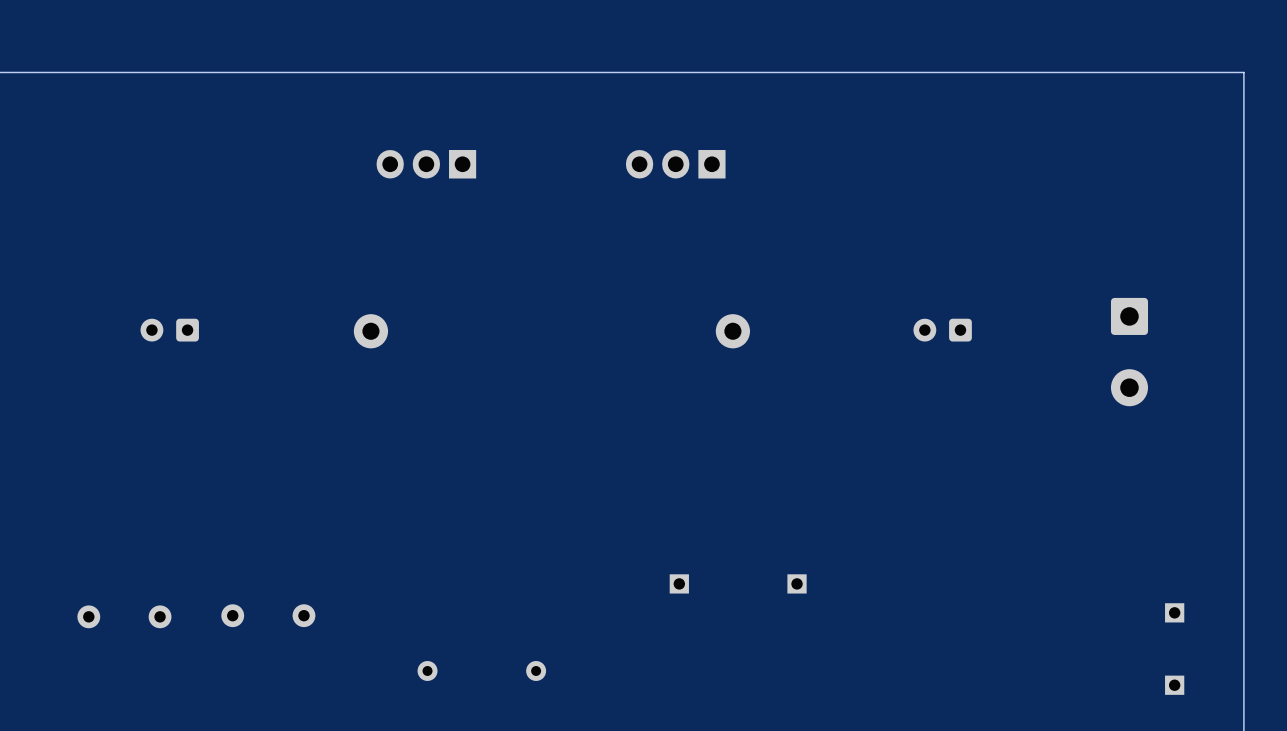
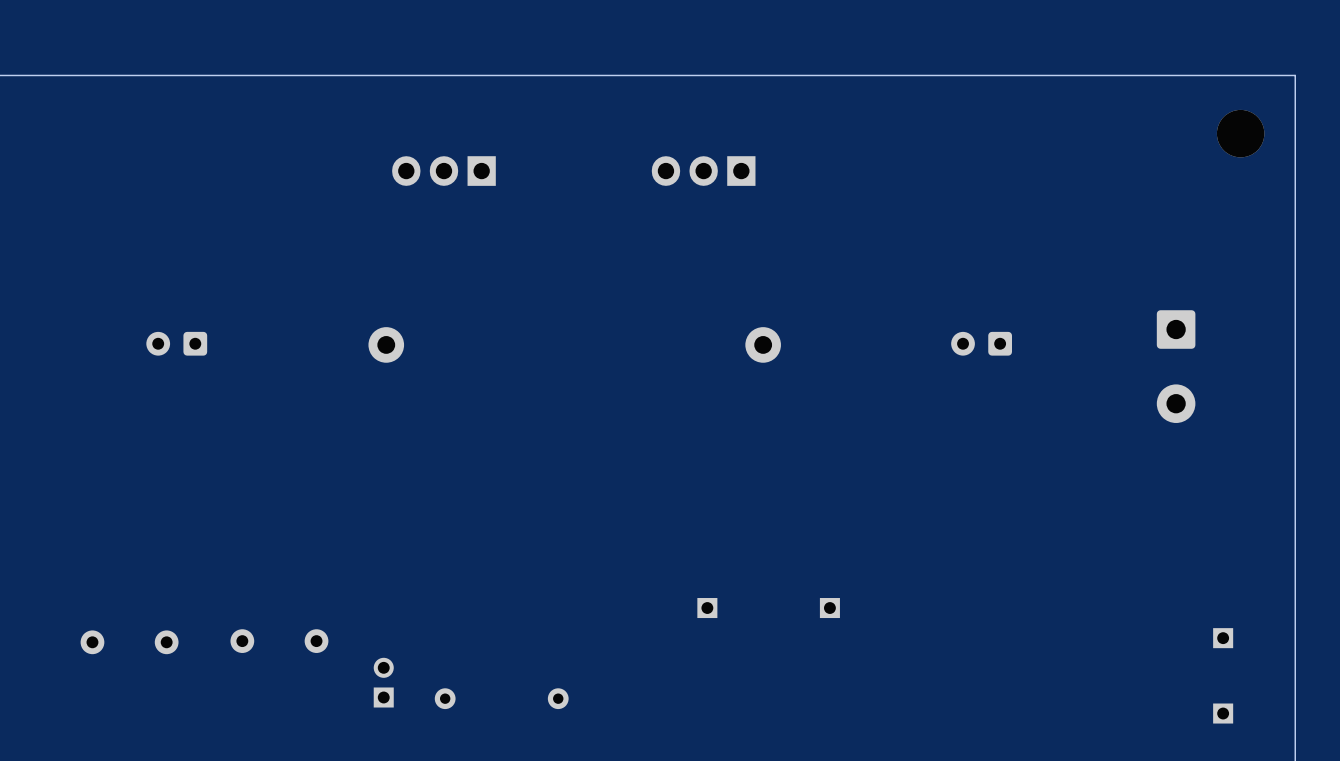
part: none -> (1240, 133)
part: none -> (383, 682)

